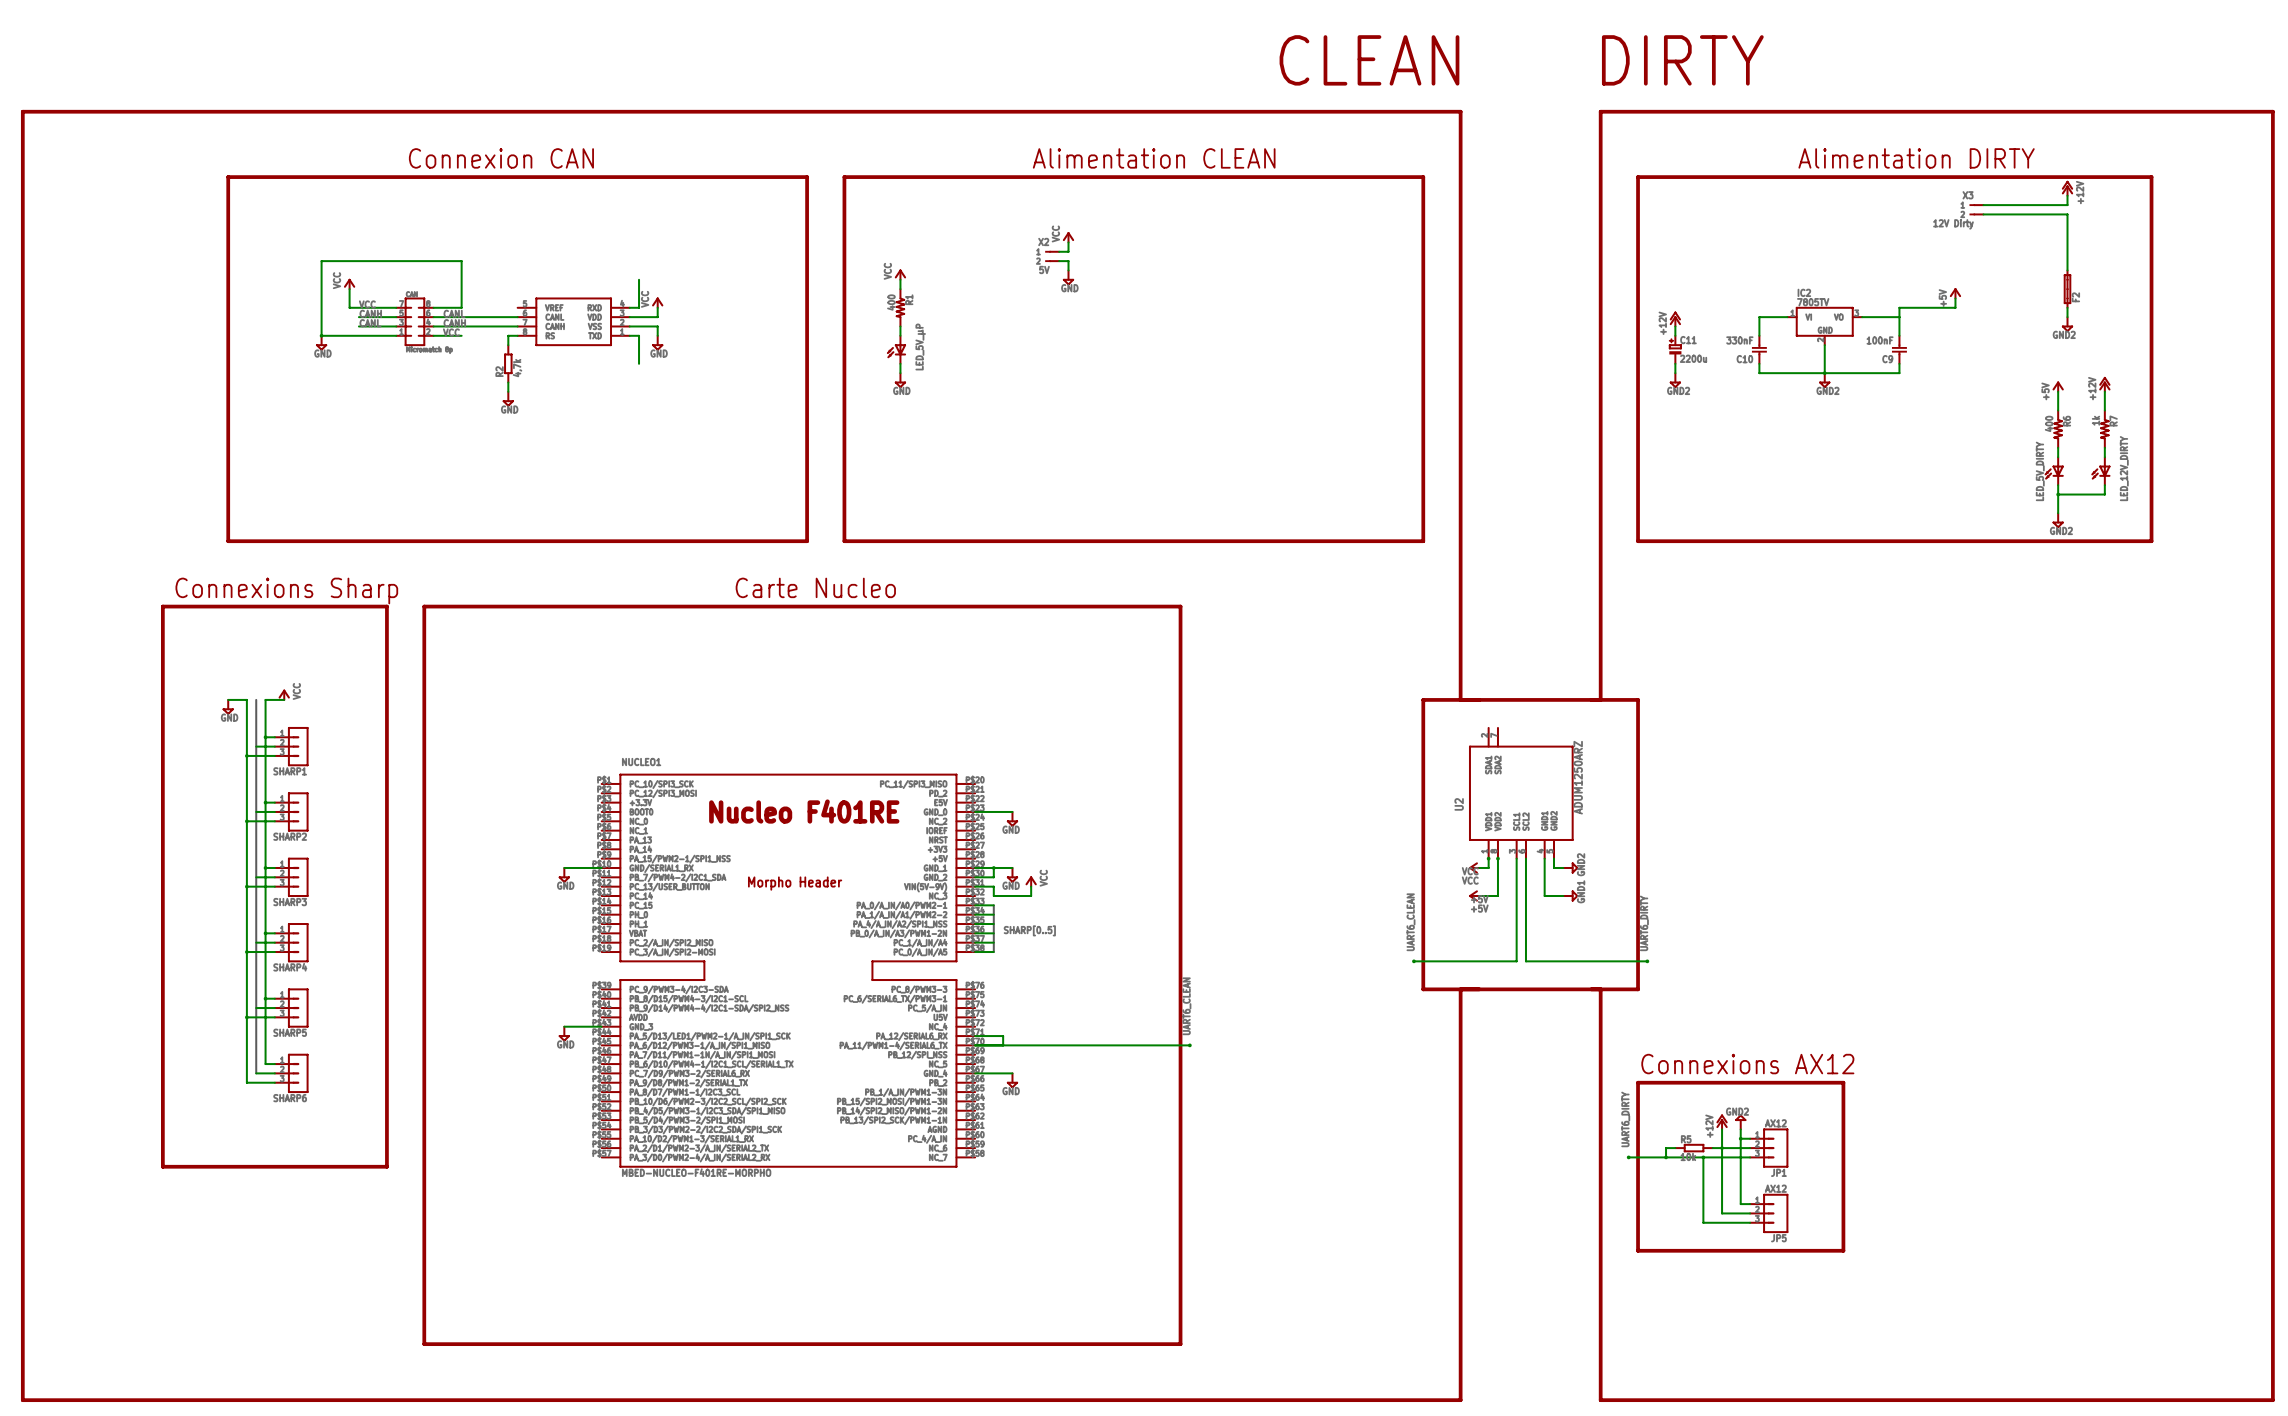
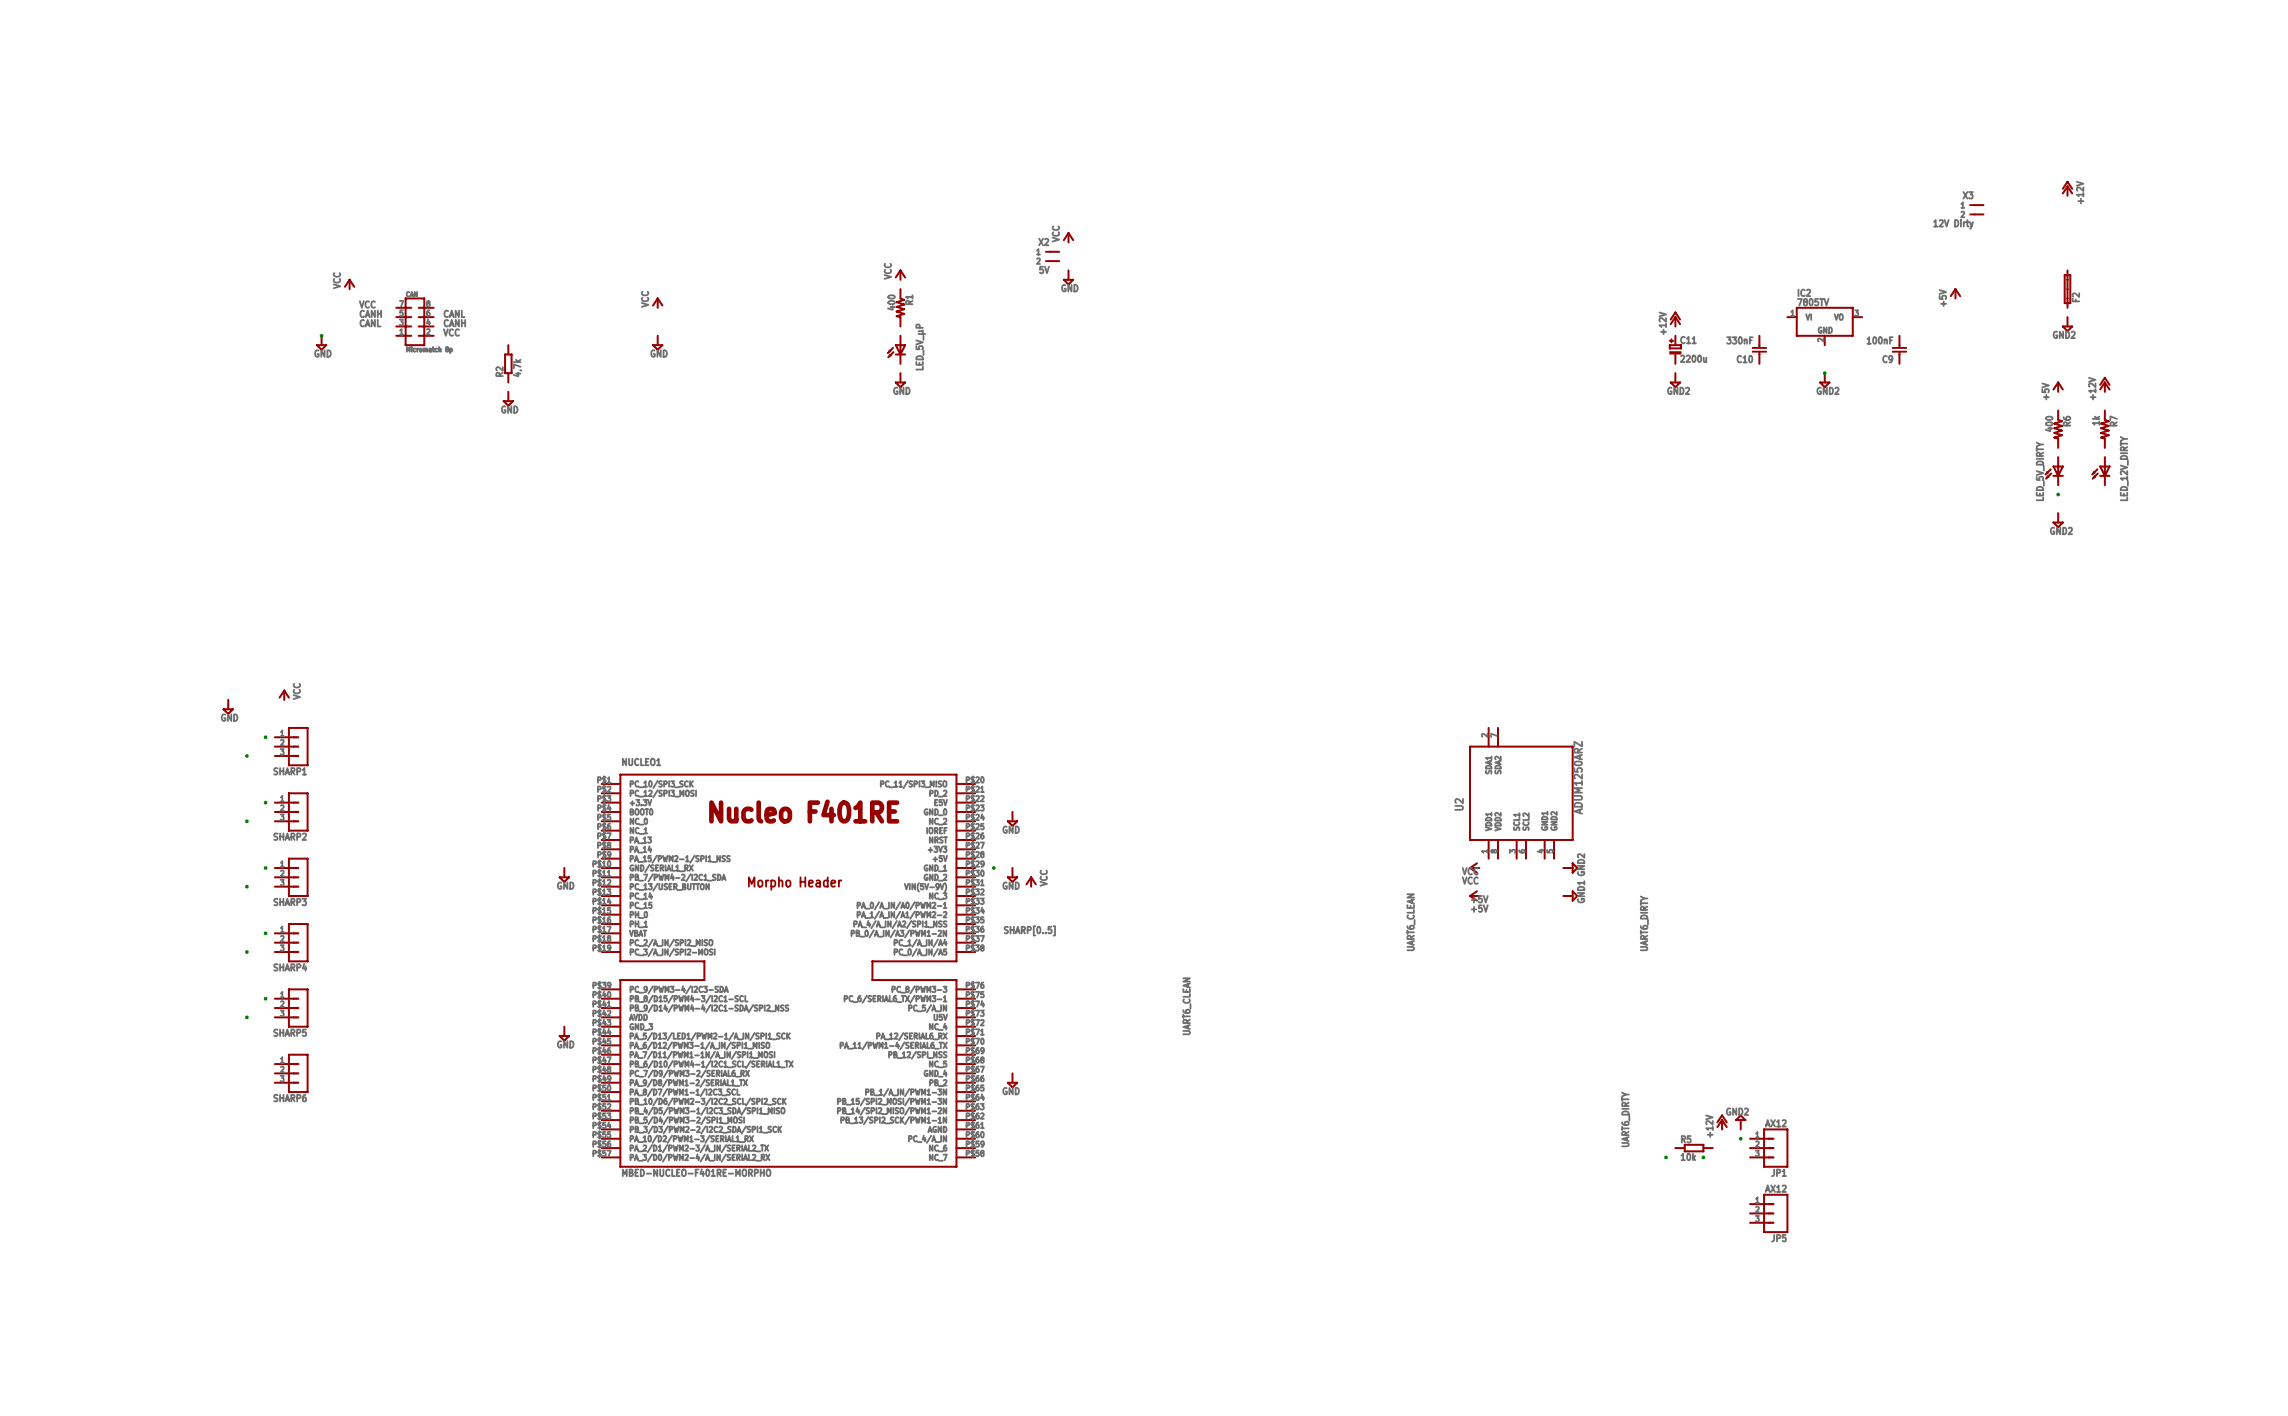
text: CLEAN (1369, 60) -> none
text: DIRTY (1682, 60) -> none
text: Connexion CAN (501, 158) -> none
text: Alimentation CLEAN (1154, 158) -> none
text: Alimentation DIRTY (1916, 158) -> none
line: (228, 177) (807, 177) (807, 541) (228, 541) (228, 177) -> none
line: (844, 177) (1423, 177) (1423, 541) (844, 541) (844, 177) -> none
line: (1638, 177) (2151, 177) (2151, 541) (1638, 541) (1638, 177) -> none
wire: (2067, 195) (2067, 205) (1983, 205) -> none
wire: (1983, 214) (2067, 214) (2067, 270) -> none
wire: (1068, 242) (1068, 251) (1059, 251) -> none
wire: (1059, 261) (1068, 261) (1068, 270) -> none
wire: (639, 279) (639, 307) (629, 307) -> none
wire: (900, 279) (900, 289) -> none
wire: (349, 289) (349, 307) (396, 307) -> none
wire: (1955, 298) (1955, 307) (1899, 307) (1899, 335) -> none
wire: (433, 307) (461, 307) (461, 261) (321, 261) (321, 335) (396, 335) -> none
wire: (657, 307) (657, 317) (629, 317) -> none
wire: (2067, 307) (2067, 317) -> none
wire: (358, 317) (396, 317) -> none
wire: (433, 317) (517, 317) -> none
wire: (1787, 317) (1759, 317) (1759, 335) -> none
wire: (1862, 317) (1899, 317) -> none
part: (573, 321) -> none
wire: (358, 326) (396, 326) -> none
wire: (433, 326) (517, 326) -> none
wire: (629, 326) (657, 326) (657, 335) -> none
wire: (900, 326) (900, 335) -> none
wire: (1675, 326) (1675, 335) -> none
wire: (433, 335) (461, 335) -> none
wire: (517, 335) (508, 335) (508, 345) -> none
wire: (629, 335) (639, 335) (639, 363) -> none
wire: (1824, 345) (1824, 373) -> none
wire: (900, 363) (900, 373) -> none
wire: (1675, 363) (1675, 373) -> none
wire: (1759, 363) (1759, 373) (1899, 373) (1899, 363) -> none
wire: (508, 382) (508, 391) -> none
wire: (2058, 391) (2058, 410) -> none
wire: (2104, 391) (2104, 410) -> none
wire: (2058, 447) (2058, 457) -> none
wire: (2104, 447) (2104, 457) -> none
wire: (2058, 485) (2058, 513) -> none
wire: (2104, 485) (2104, 494) (2058, 494) -> none
text: Carte Nucleo (815, 587) -> none
text: Connexions Sharp (286, 591) -> none
line: (162, 606) (386, 606) (386, 1166) (162, 1166) (162, 606) -> none
line: (424, 606) (1180, 606) (1180, 1344) (424, 1344) (424, 606) -> none
wire: (228, 699) (246, 699) (246, 1082) (274, 1082) -> none
bus: (256, 699) (256, 1073) -> none
wire: (284, 699) (265, 699) (265, 1064) (274, 1064) -> none
line: (1423, 699) (1638, 699) (1638, 989) (1423, 989) (1423, 699) -> none
line: (1460, 699) (1460, 111) (22, 111) (22, 1400) (1460, 1400) (1460, 989) -> none
line: (1600, 699) (1600, 111) (2272, 111) (2272, 1400) (1600, 1400) (1600, 989) -> none
wire: (265, 737) (274, 737) -> none
wire: (256, 746) (274, 746) -> none
wire: (246, 755) (274, 755) -> none
wire: (265, 802) (274, 802) -> none
wire: (256, 811) (274, 811) -> none
wire: (975, 811) (1012, 811) -> none
wire: (246, 821) (274, 821) -> none
wire: (1488, 858) (1488, 867) (1479, 867) -> none
junction: (1488, 858) -> none
wire: (1497, 858) (1497, 895) (1479, 895) -> none
junction: (1497, 858) -> none
wire: (1516, 858) (1516, 961) (1413, 961) -> none
wire: (1525, 858) (1525, 961) (1647, 961) -> none
wire: (1544, 858) (1544, 895) (1563, 895) -> none
wire: (1553, 858) (1553, 867) (1563, 867) -> none
wire: (265, 867) (274, 867) -> none
wire: (564, 867) (601, 867) -> none
wire: (975, 867) (1012, 867) -> none
wire: (993, 867) (993, 877) (975, 877) -> none
wire: (256, 877) (274, 877) -> none
wire: (246, 886) (274, 886) -> none
wire: (975, 886) (993, 886) (993, 895) (1031, 895) (1031, 886) -> none
wire: (975, 905) (993, 905) -> none
bus: (993, 905) (993, 952) -> none
wire: (975, 914) (993, 914) -> none
wire: (975, 924) (993, 924) -> none
wire: (265, 933) (274, 933) -> none
wire: (975, 933) (993, 933) -> none
wire: (256, 942) (274, 942) -> none
wire: (975, 942) (993, 942) -> none
wire: (246, 952) (274, 952) -> none
wire: (975, 952) (993, 952) -> none
junction: (1413, 961) -> none
junction: (1647, 961) -> none
wire: (265, 998) (274, 998) -> none
wire: (256, 1008) (274, 1008) -> none
wire: (246, 1017) (274, 1017) -> none
wire: (564, 1026) (601, 1026) -> none
wire: (975, 1036) (1003, 1036) (1003, 1045) -> none
wire: (975, 1045) (1189, 1045) -> none
junction: (1189, 1045) -> none
text: Connexions AX12 (1747, 1064) -> none
wire: (256, 1073) (274, 1073) -> none
wire: (975, 1073) (1012, 1073) -> none
line: (1638, 1082) (1638, 1250) (1843, 1250) (1843, 1082) (1638, 1082) -> none
wire: (1722, 1129) (1722, 1213) (1750, 1213) -> none
wire: (1740, 1129) (1740, 1204) (1750, 1204) -> none
wire: (1740, 1138) (1750, 1138) -> none
wire: (1675, 1148) (1666, 1148) (1666, 1157) -> none
wire: (1712, 1148) (1750, 1148) -> none
wire: (1628, 1157) (1750, 1157) -> none
junction: (1628, 1157) -> none
wire: (1703, 1157) (1703, 1222) (1750, 1222) -> none

